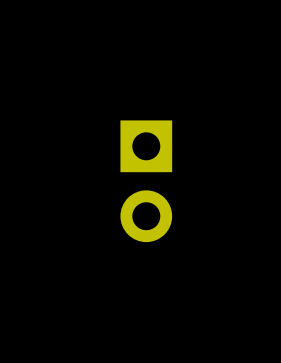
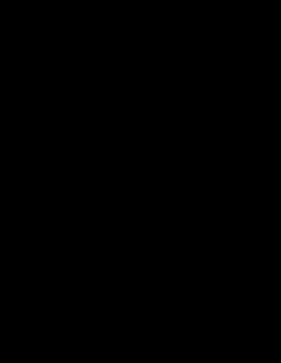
part: (146, 181) -> none

